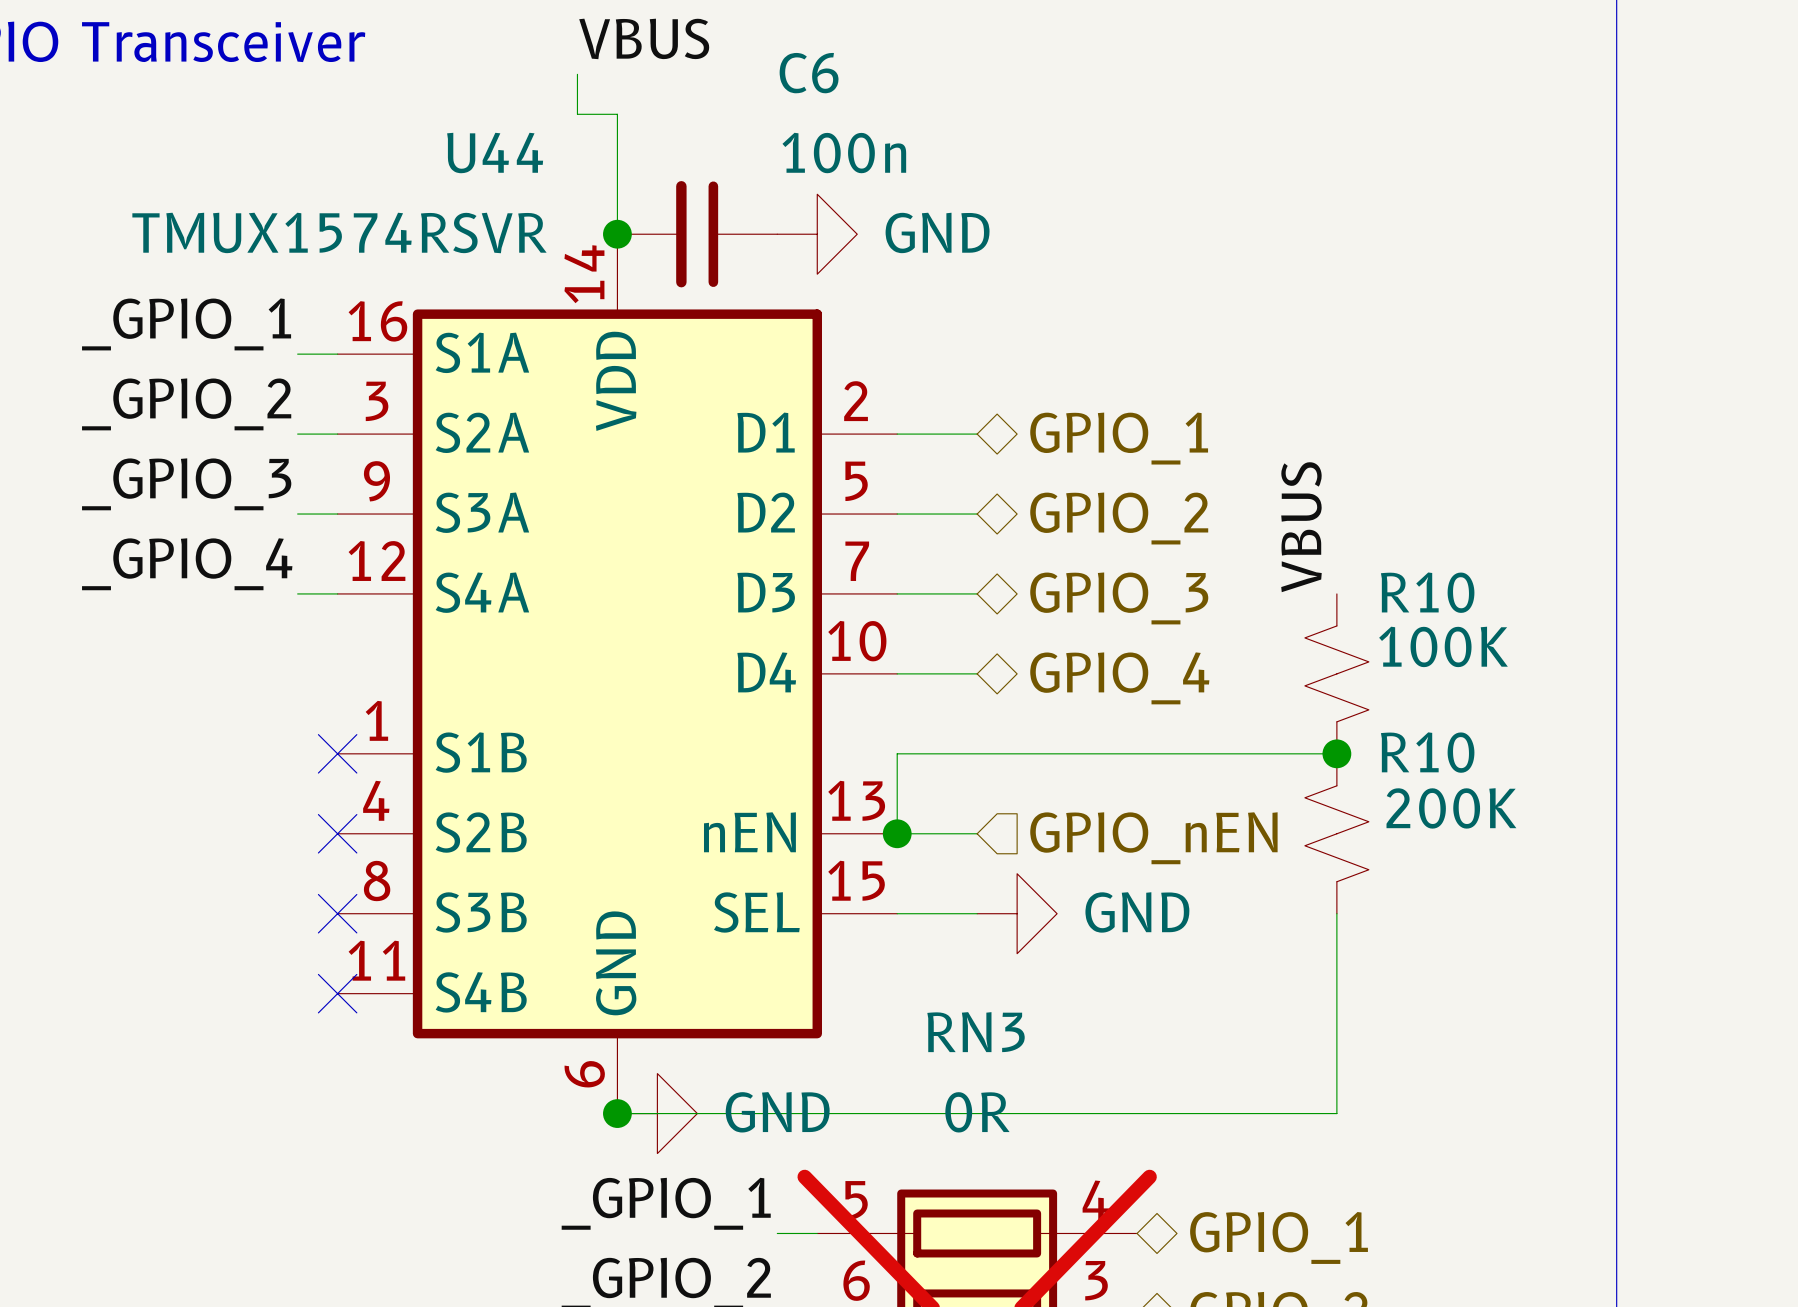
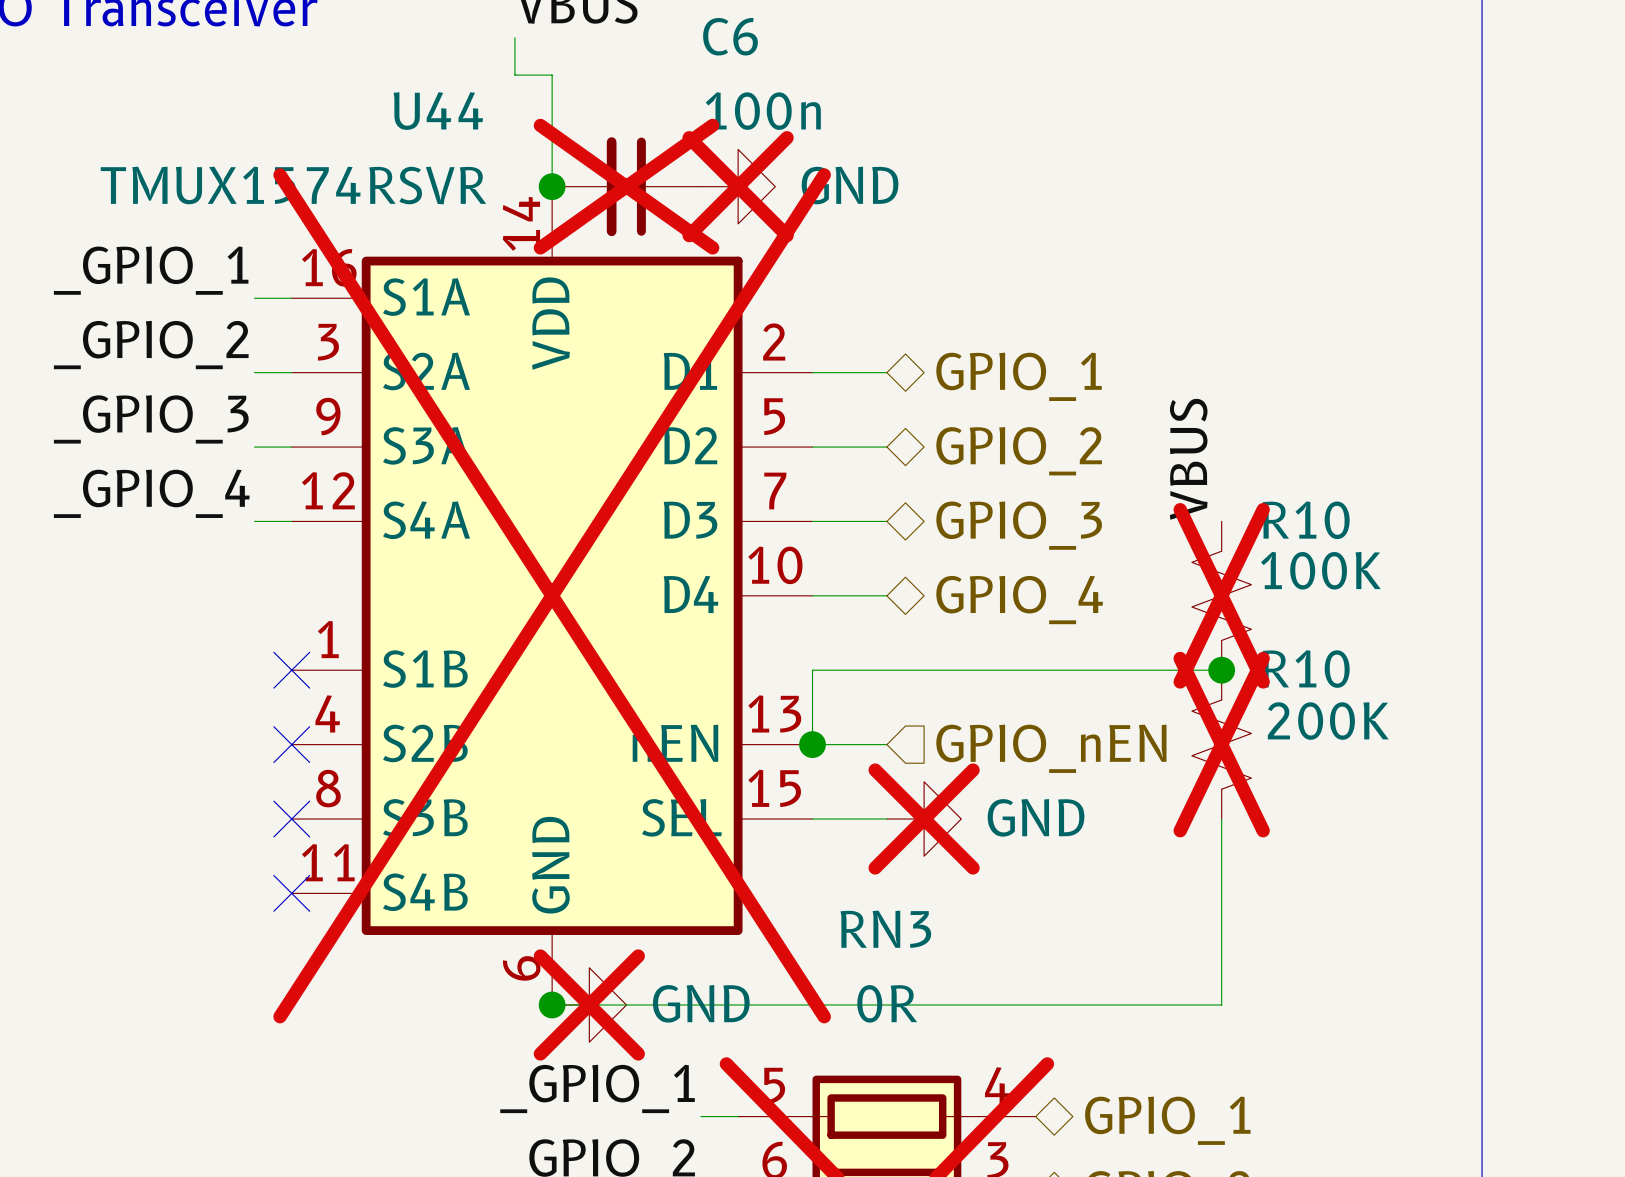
C6 do-not-place cross: none -> (626, 186)
power symbol do-not-place cross: none -> (738, 186)
U44 do-not-place cross: none -> (552, 595)
R10 do-not-place cross: none -> (1221, 595)
R10 do-not-place cross: none -> (1221, 744)
power symbol do-not-place cross: none -> (924, 819)
power symbol do-not-place cross: none -> (589, 1004)

